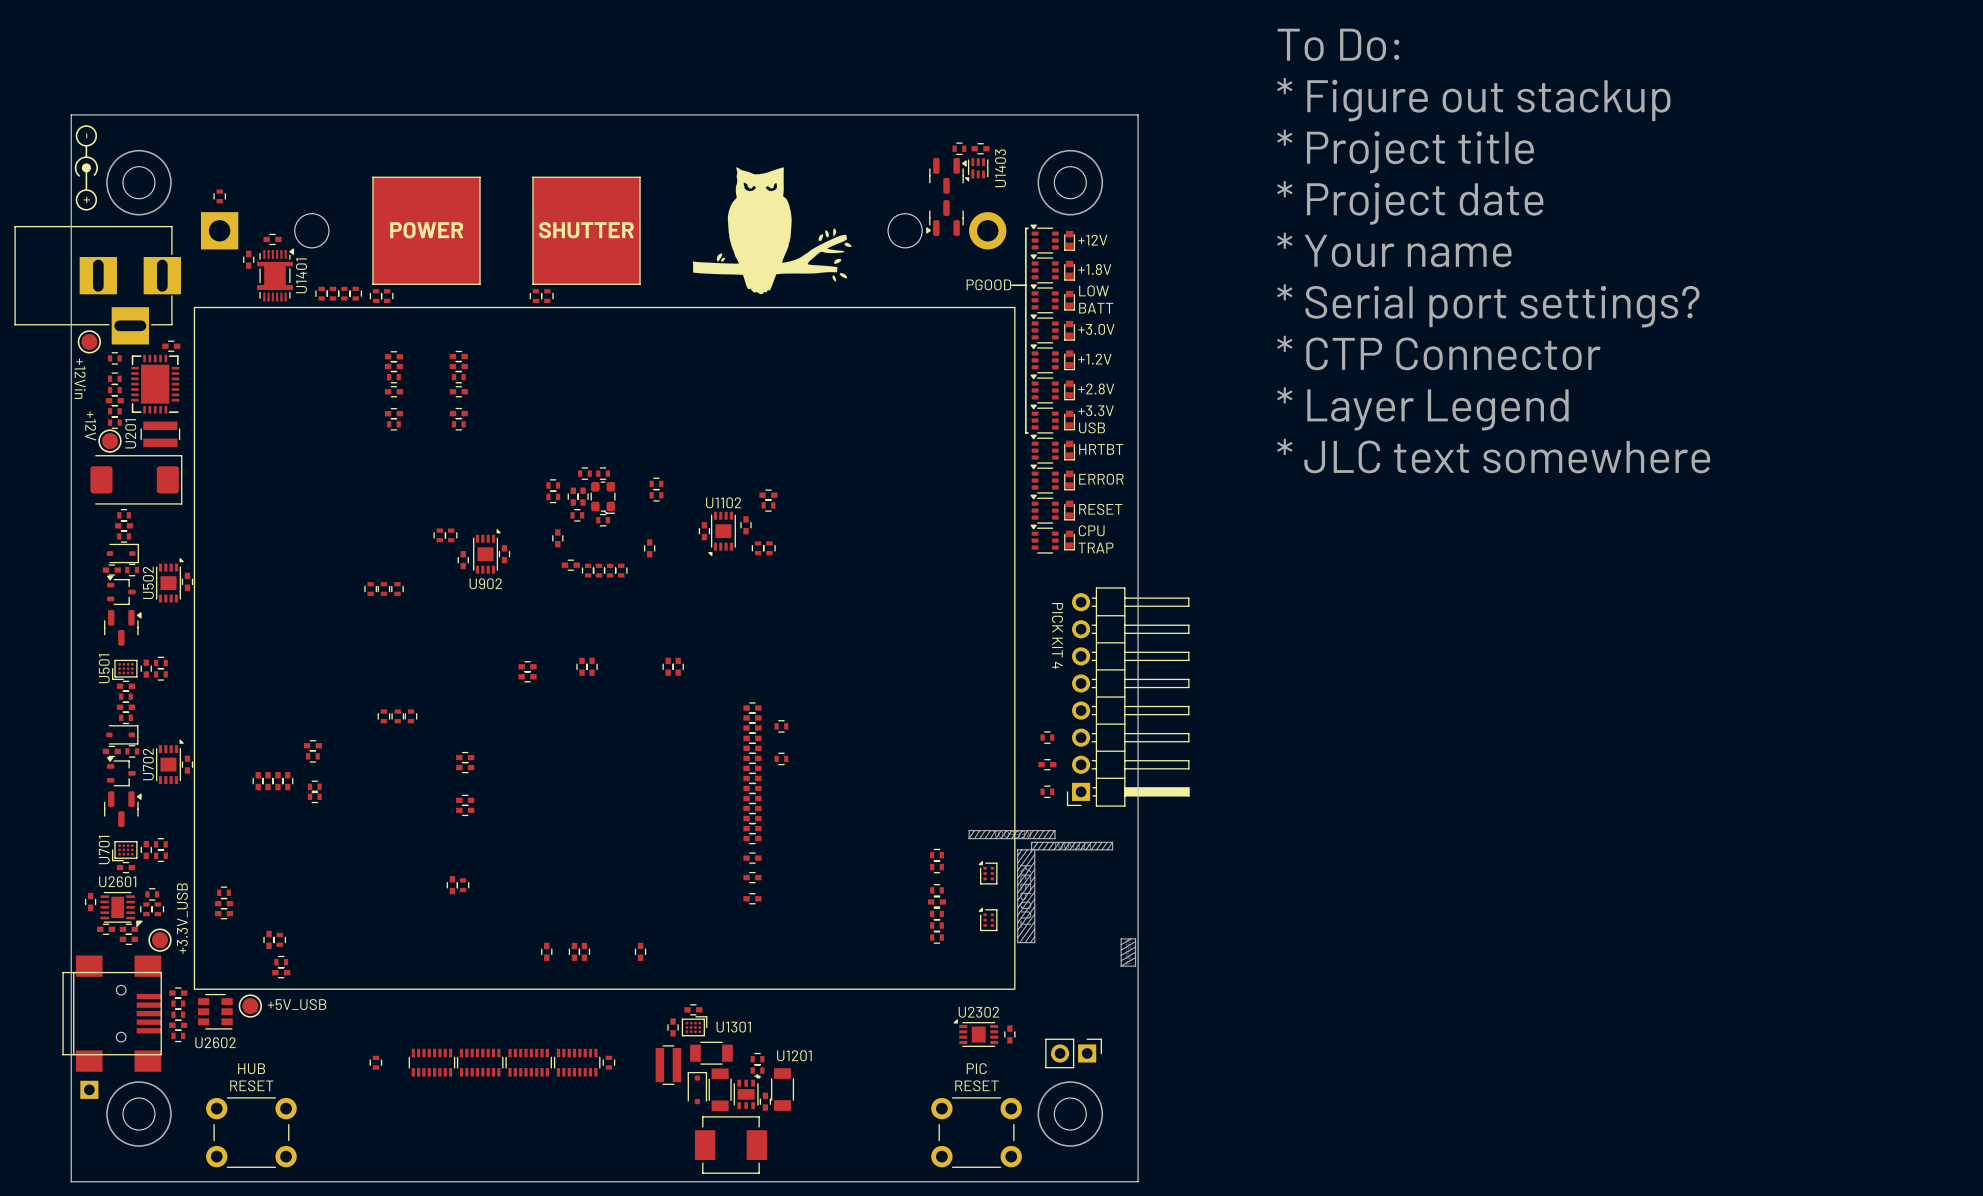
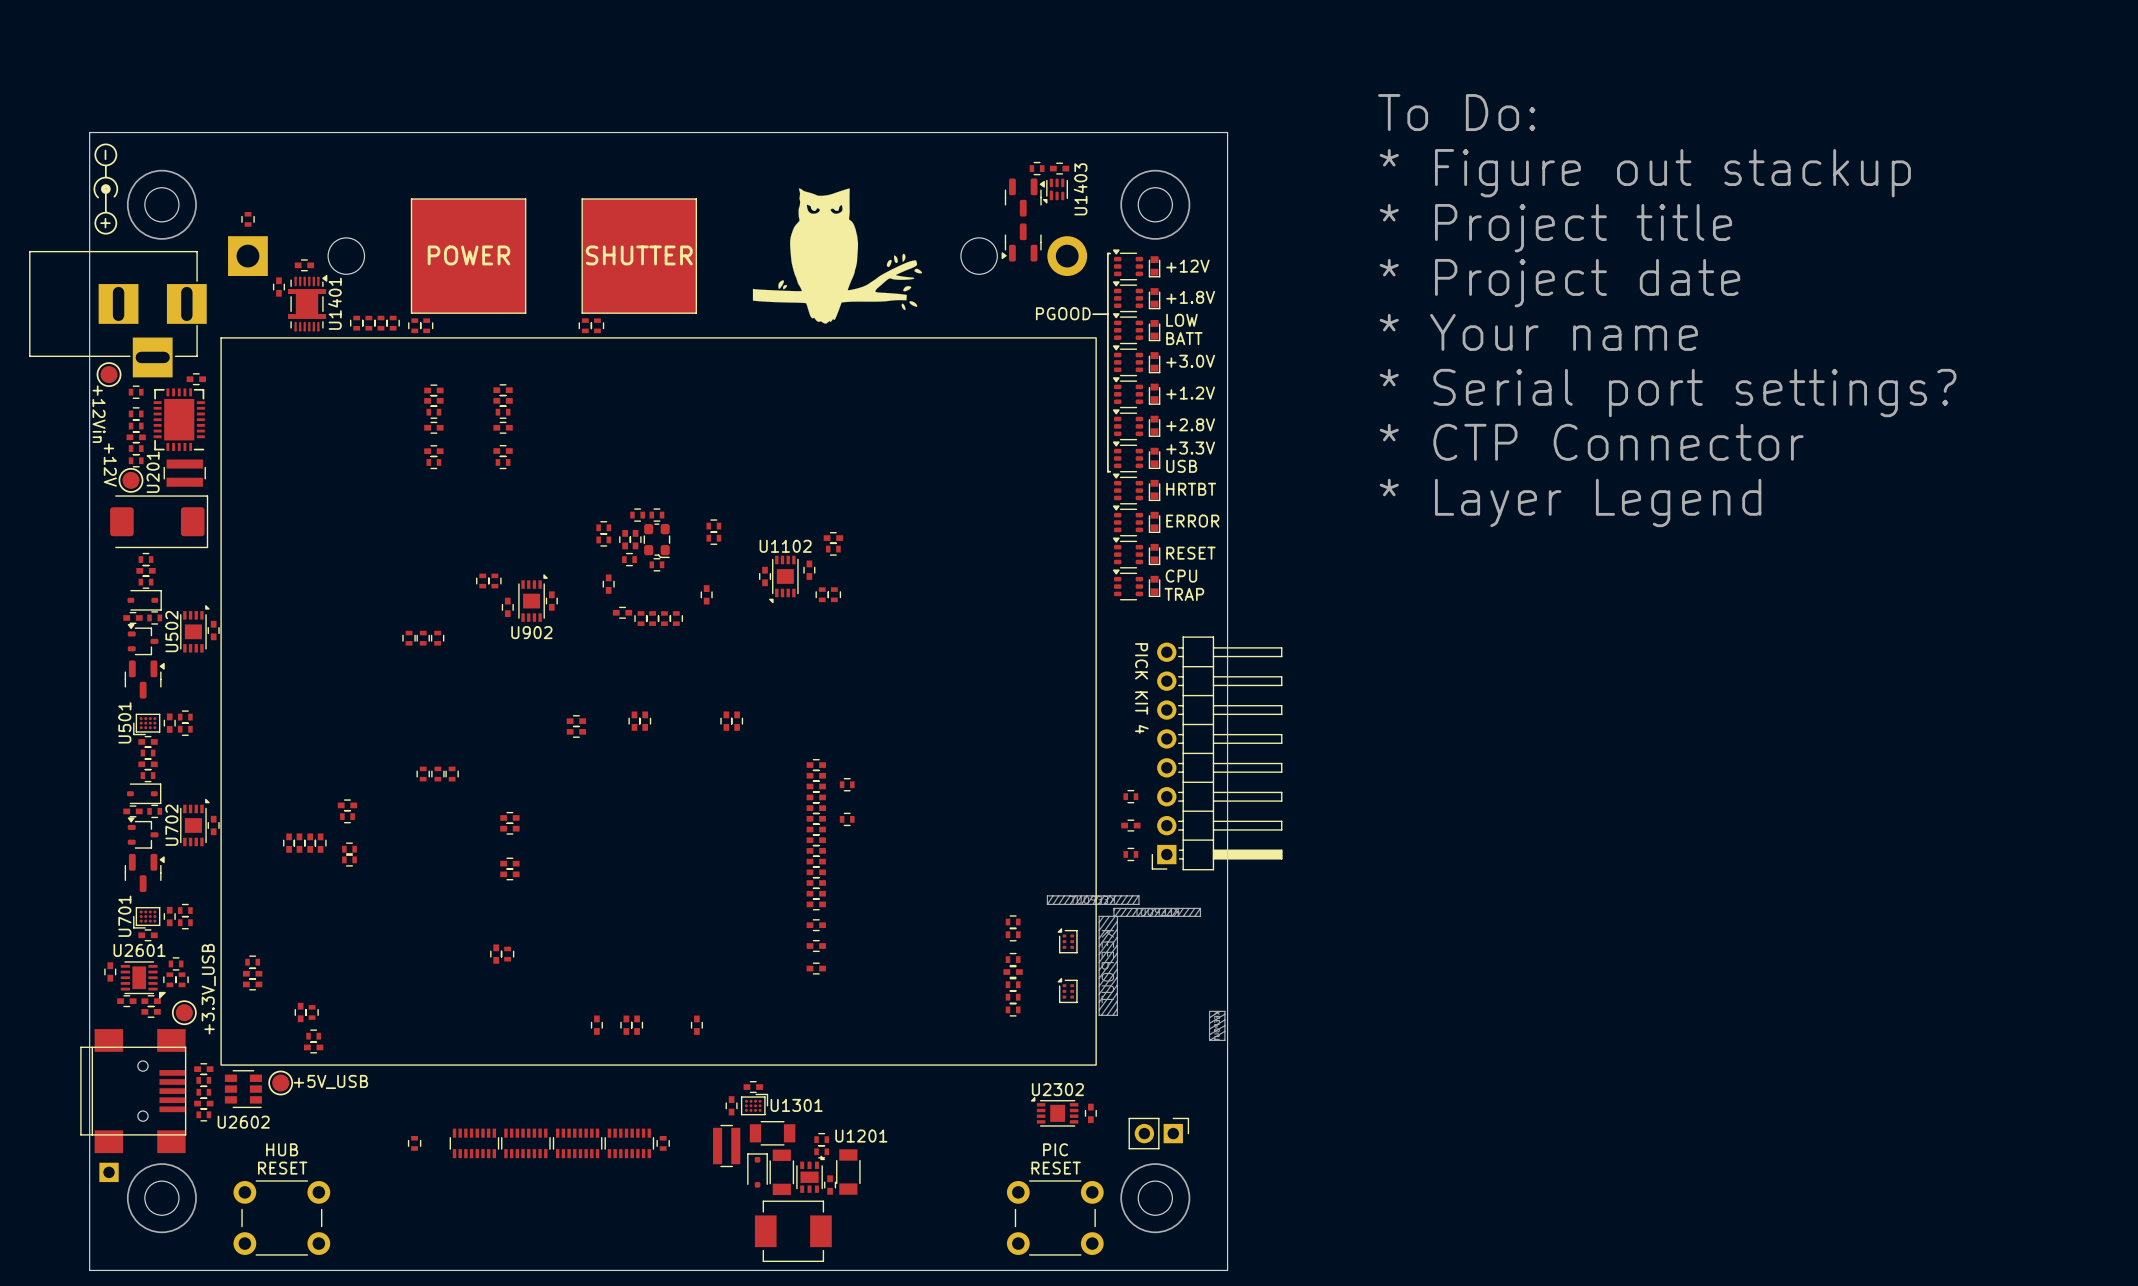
text: To Do: (1338, 44) -> none
text: * Figure out stackup (1473, 99) -> To Do: (1456, 112)
text: * Project title (1405, 151) -> * Figure out stackup (1645, 173)
text: * Project date (1410, 202) -> * Project title (1555, 228)
text: * Your name (1394, 249) -> * Project date (1559, 283)
text: * Serial port settings? (1488, 305) -> * Your name (1538, 332)
text: * CTP Connector (1438, 352) -> * Serial port settings? (1668, 393)
text: * Layer Legend (1422, 408) -> * CTP Connector (1591, 442)
text: * JLC text somewhere (1493, 456) -> * Layer Legend (1570, 502)

